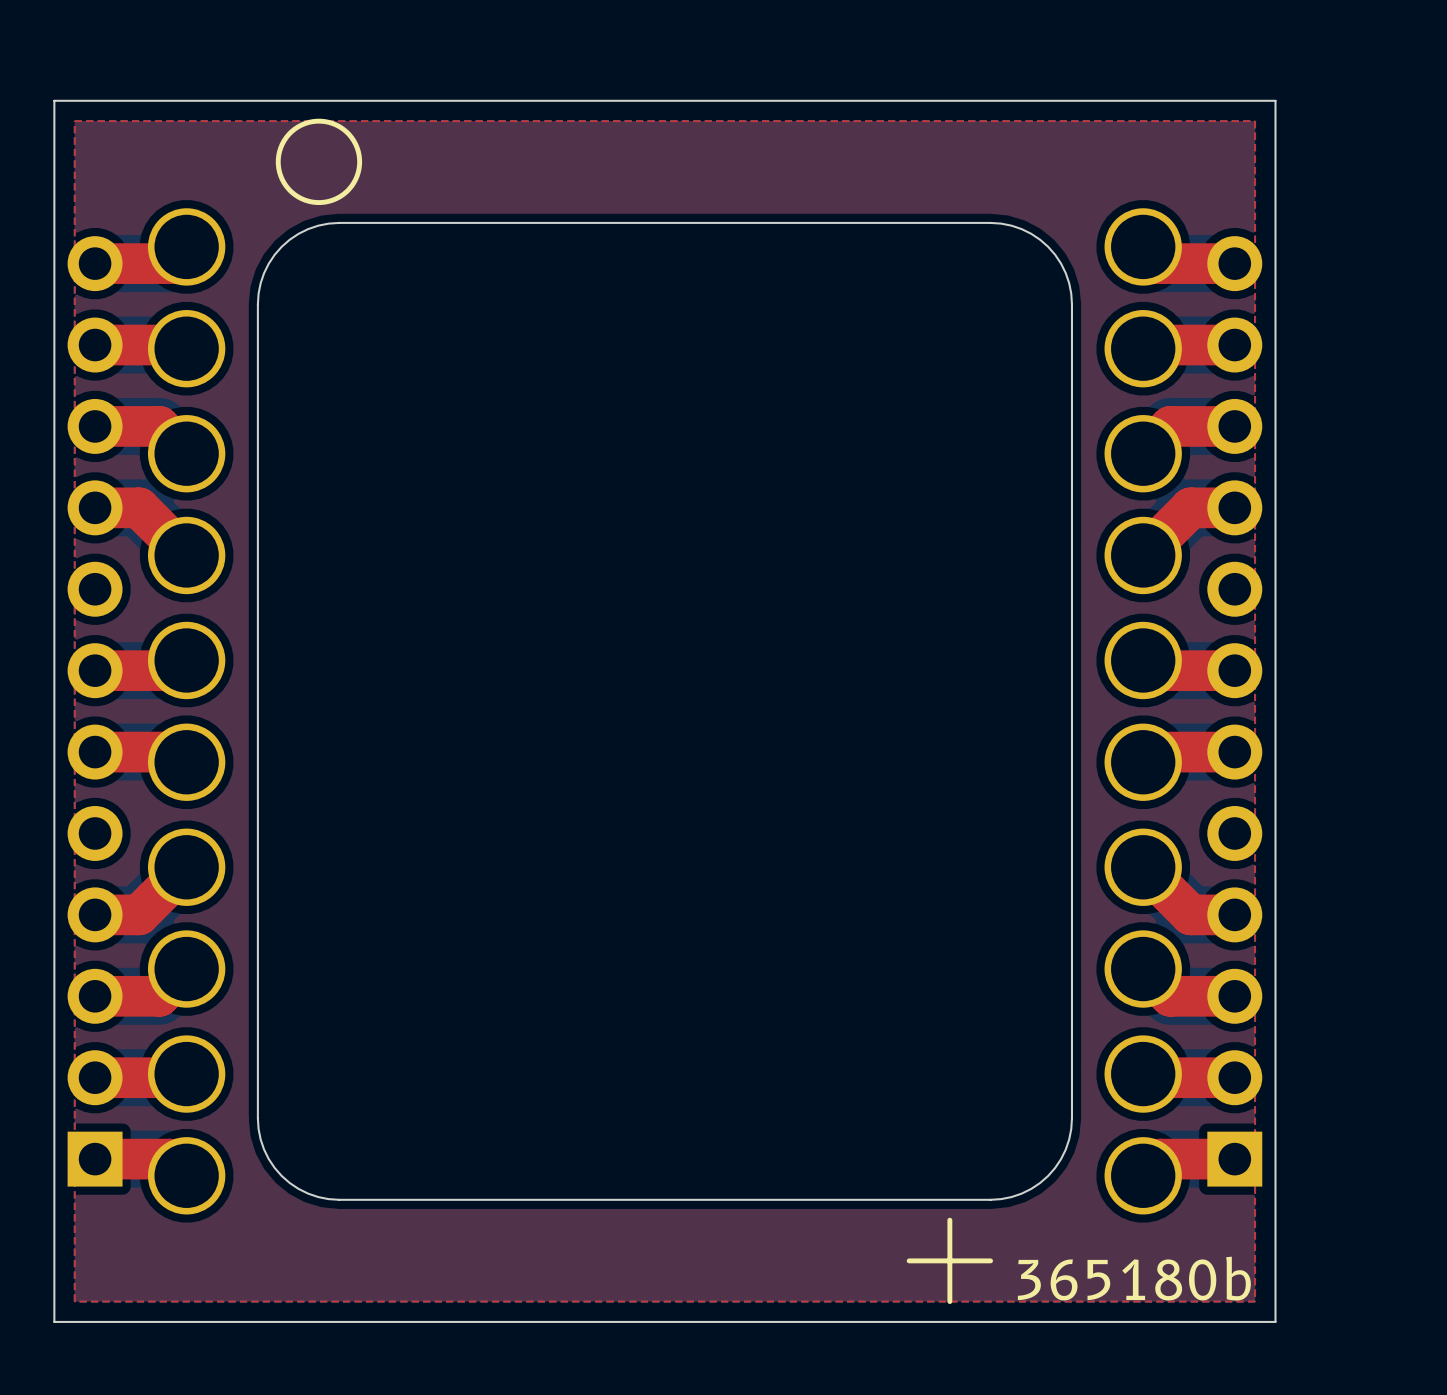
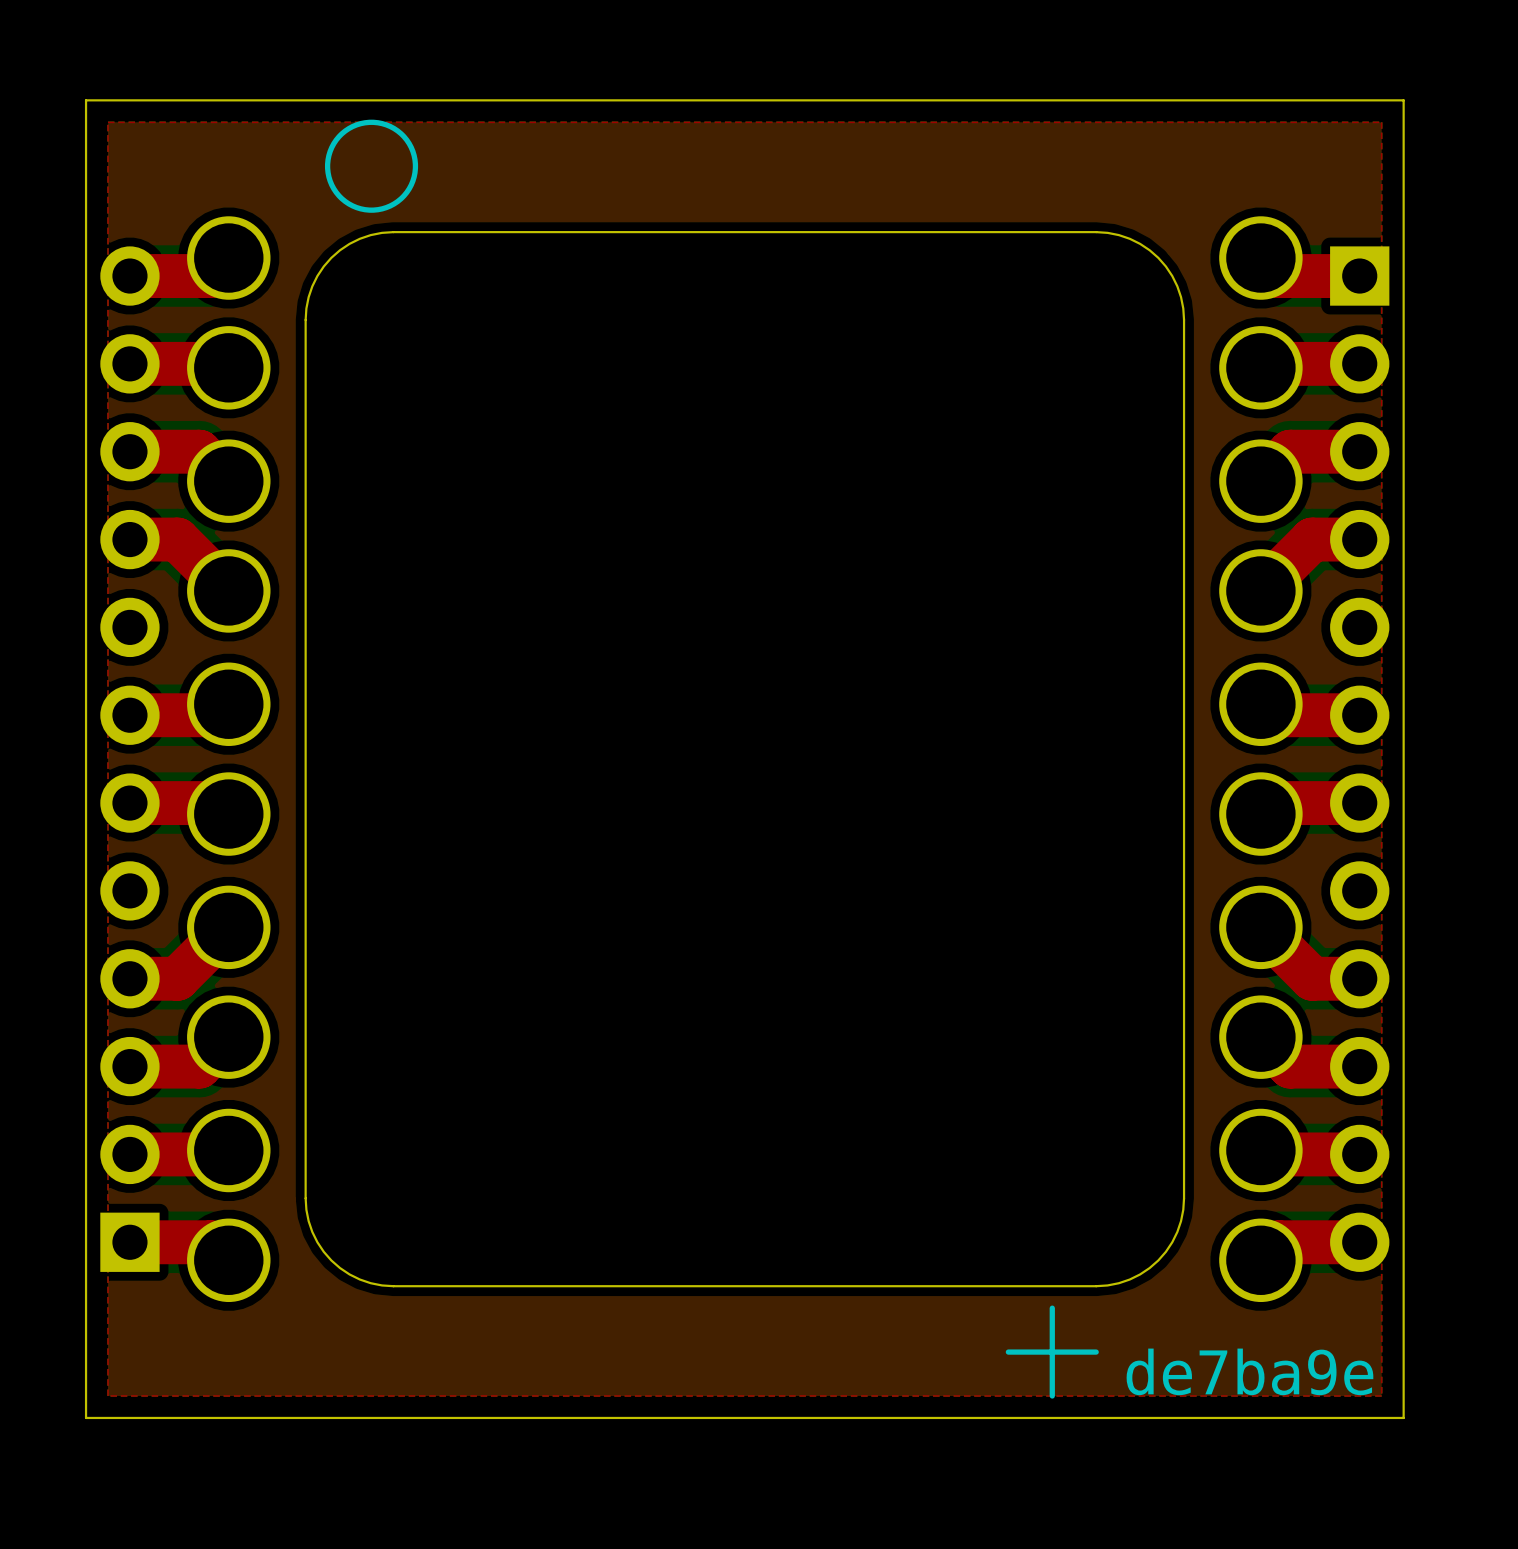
part rotation: 0° (1234, 711) -> 180° (1359, 759)
text: 365180b (1134, 1278) -> de7ba9e (1249, 1371)

